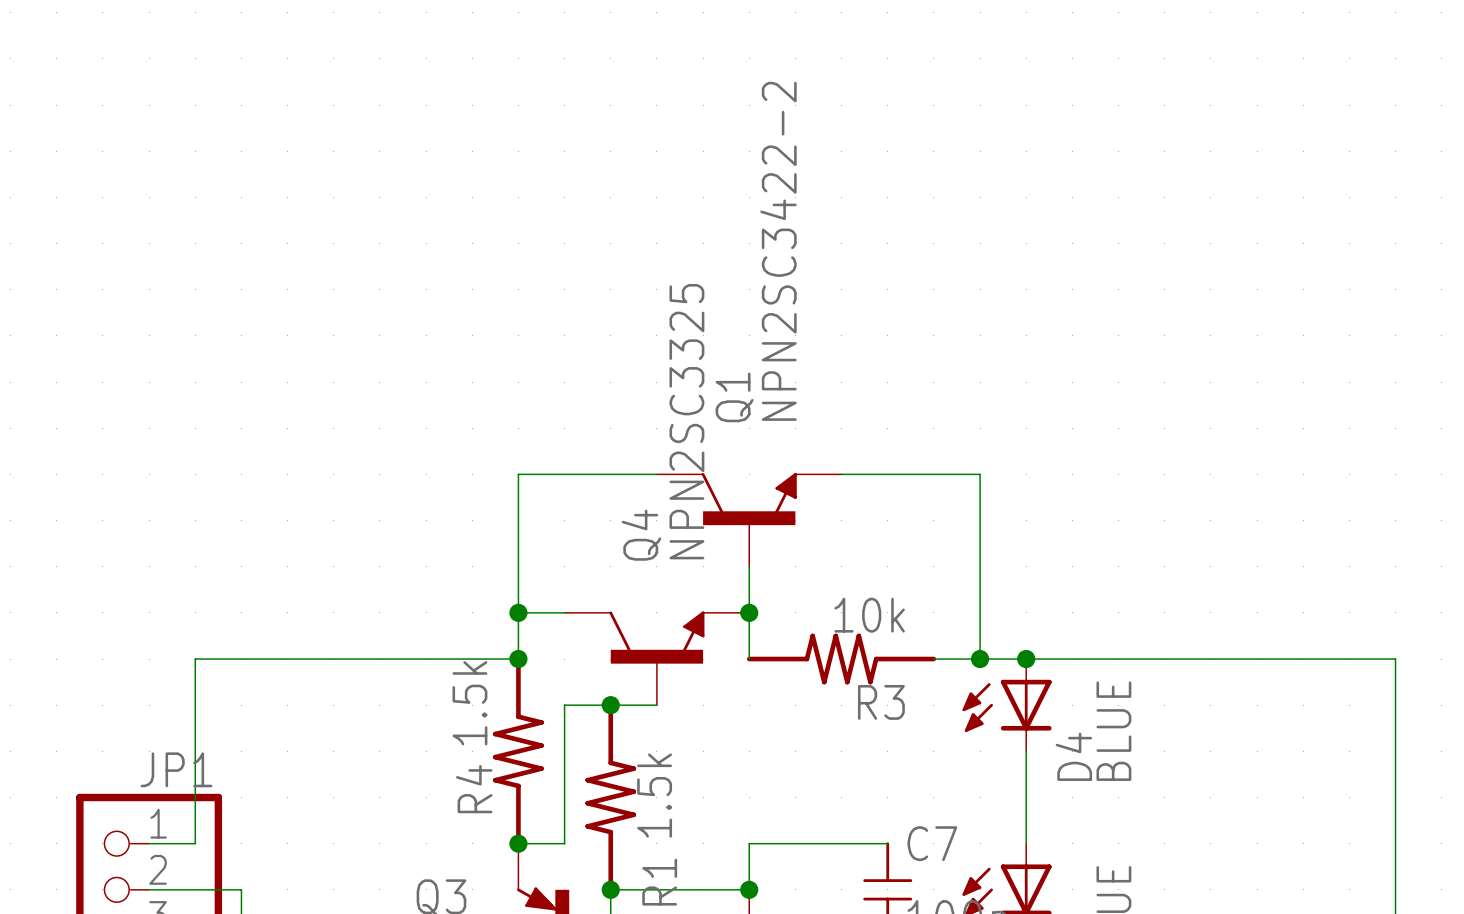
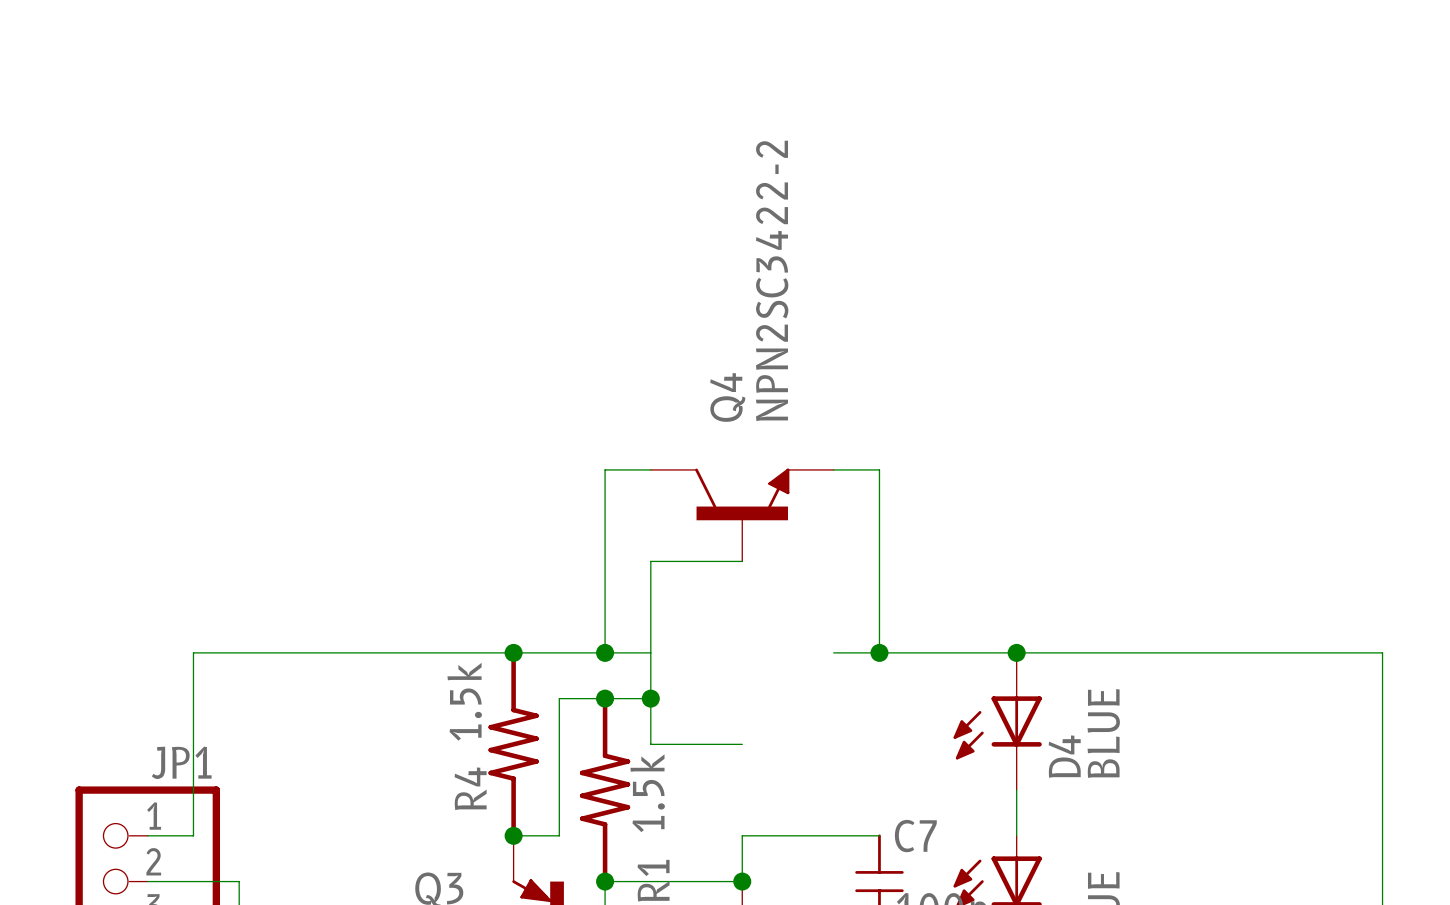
Q1 name: Q1 (734, 397) -> Q4 (727, 397)
wire: (610, 474) (518, 474) (518, 659) -> (605, 469) (605, 652)
wire: (887, 474) (980, 474) (980, 659) -> (879, 469) (879, 652)
wire: (749, 566) (749, 659) -> (742, 561) (650, 561) (650, 744) (742, 744)
wire: (518, 612) (564, 612) -> none
junction: (518, 612) -> none
junction: (749, 612) -> none
Q4: NPN2SC3325 (656, 658) -> none
wire: none -> (513, 652) (650, 652)
junction: none -> (605, 652)
R3: 10k (841, 659) -> none
junction: none -> (879, 652)
D4 symbol: [962, 659, 1052, 752] -> [953, 652, 1042, 791]
junction: (980, 659) -> none
junction: none -> (650, 698)

